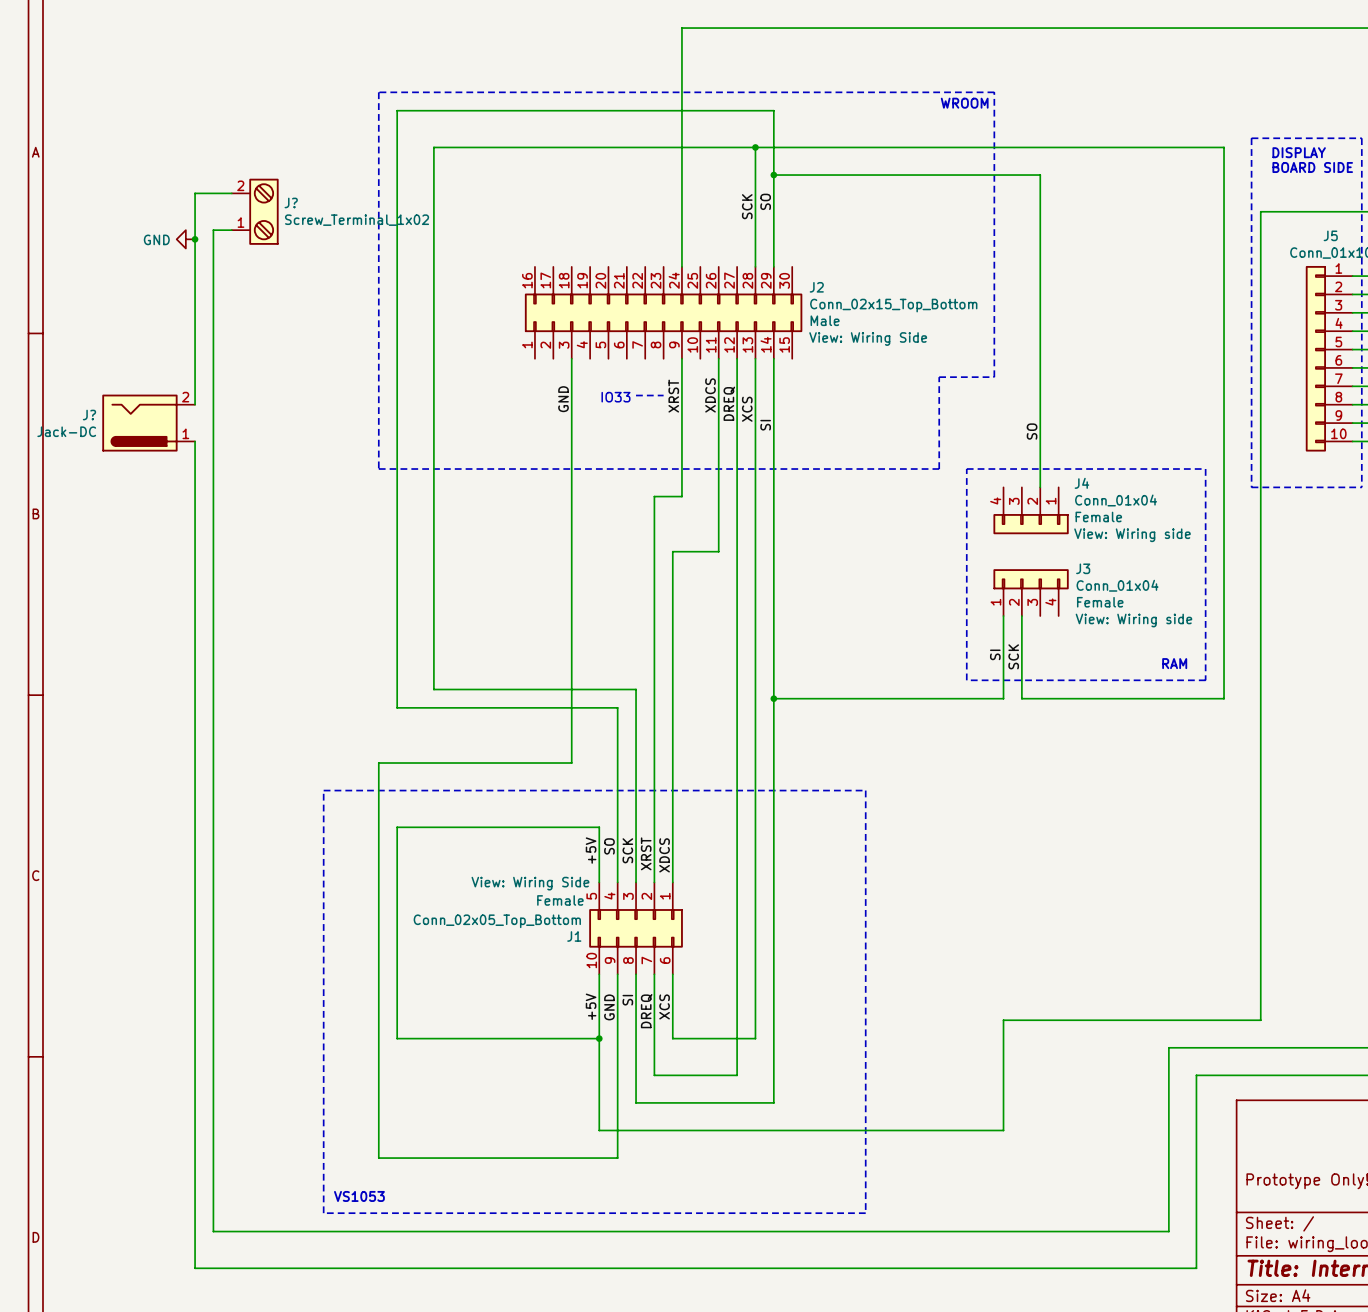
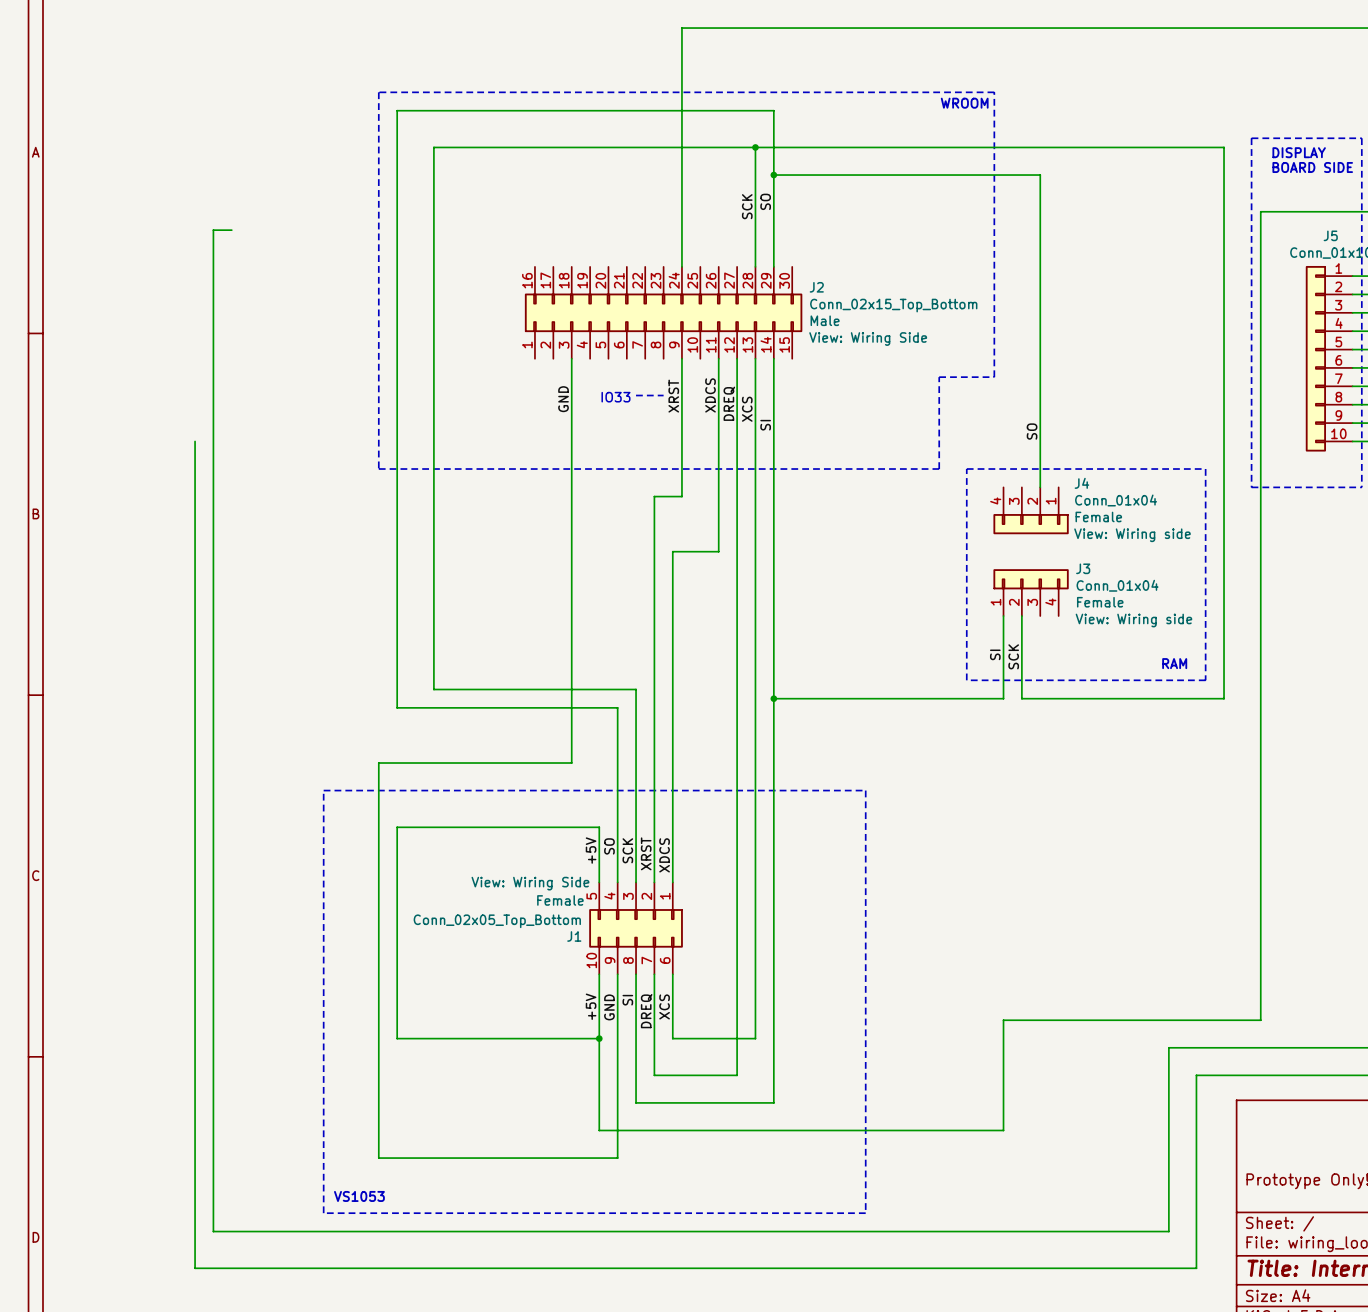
wire: (231, 193) (195, 193) (195, 404) -> none
J?: Screw_Terminal_1x02 (255, 211) -> none
power symbol: GND (185, 239) -> none
junction: (195, 239) -> none
J?: Jack-DC (148, 423) -> none

